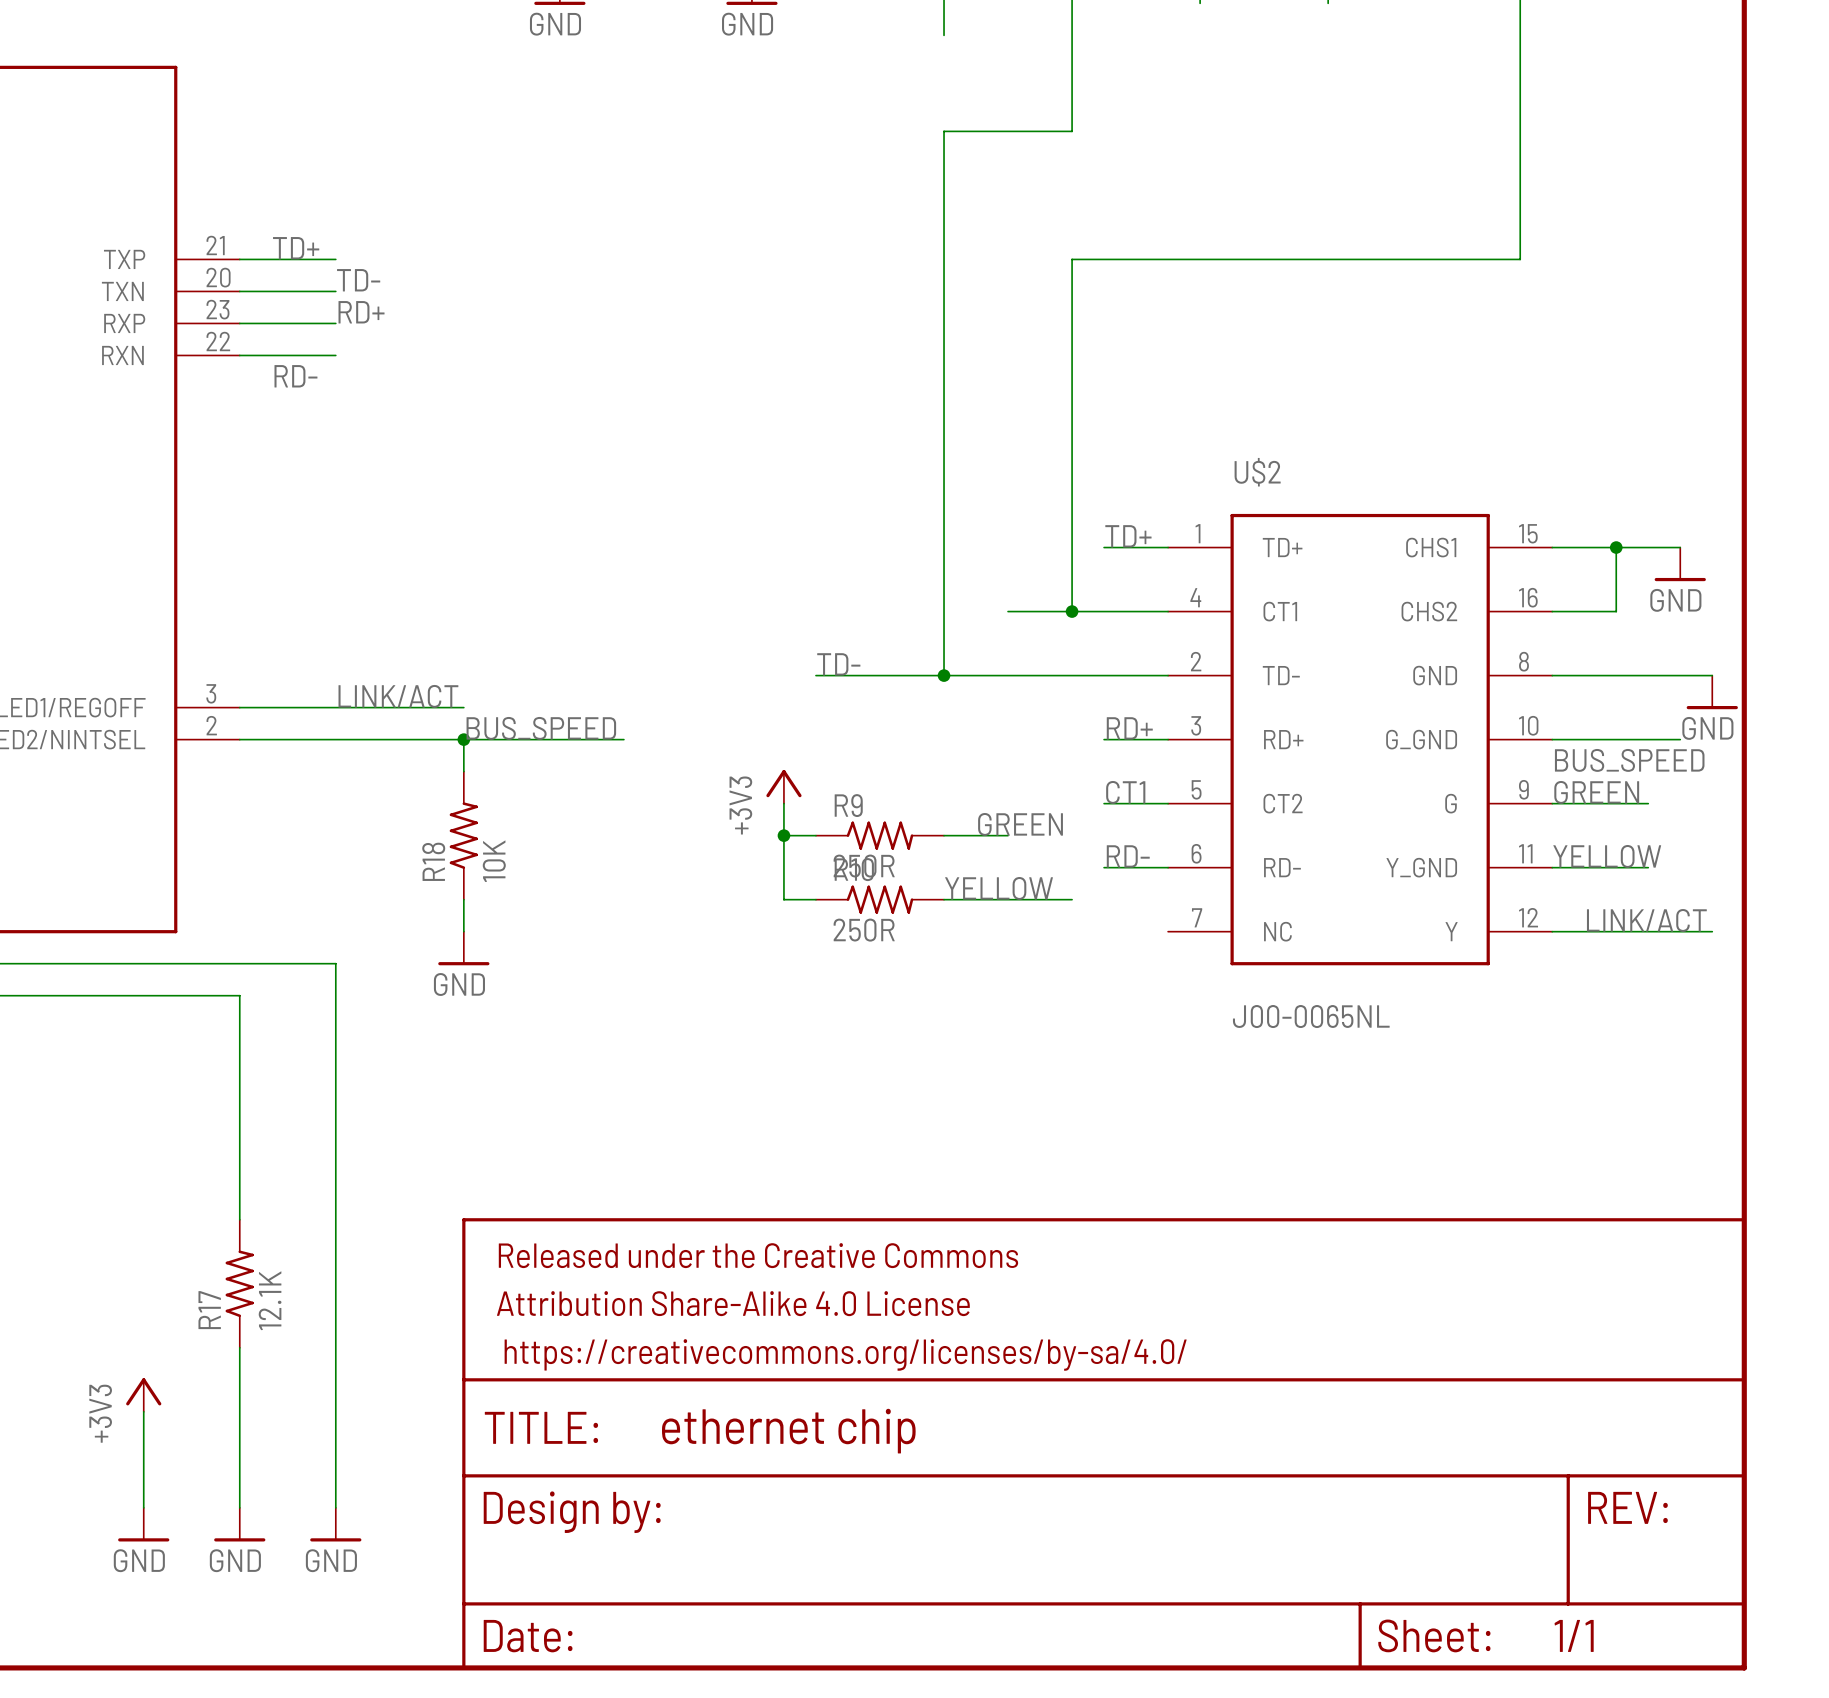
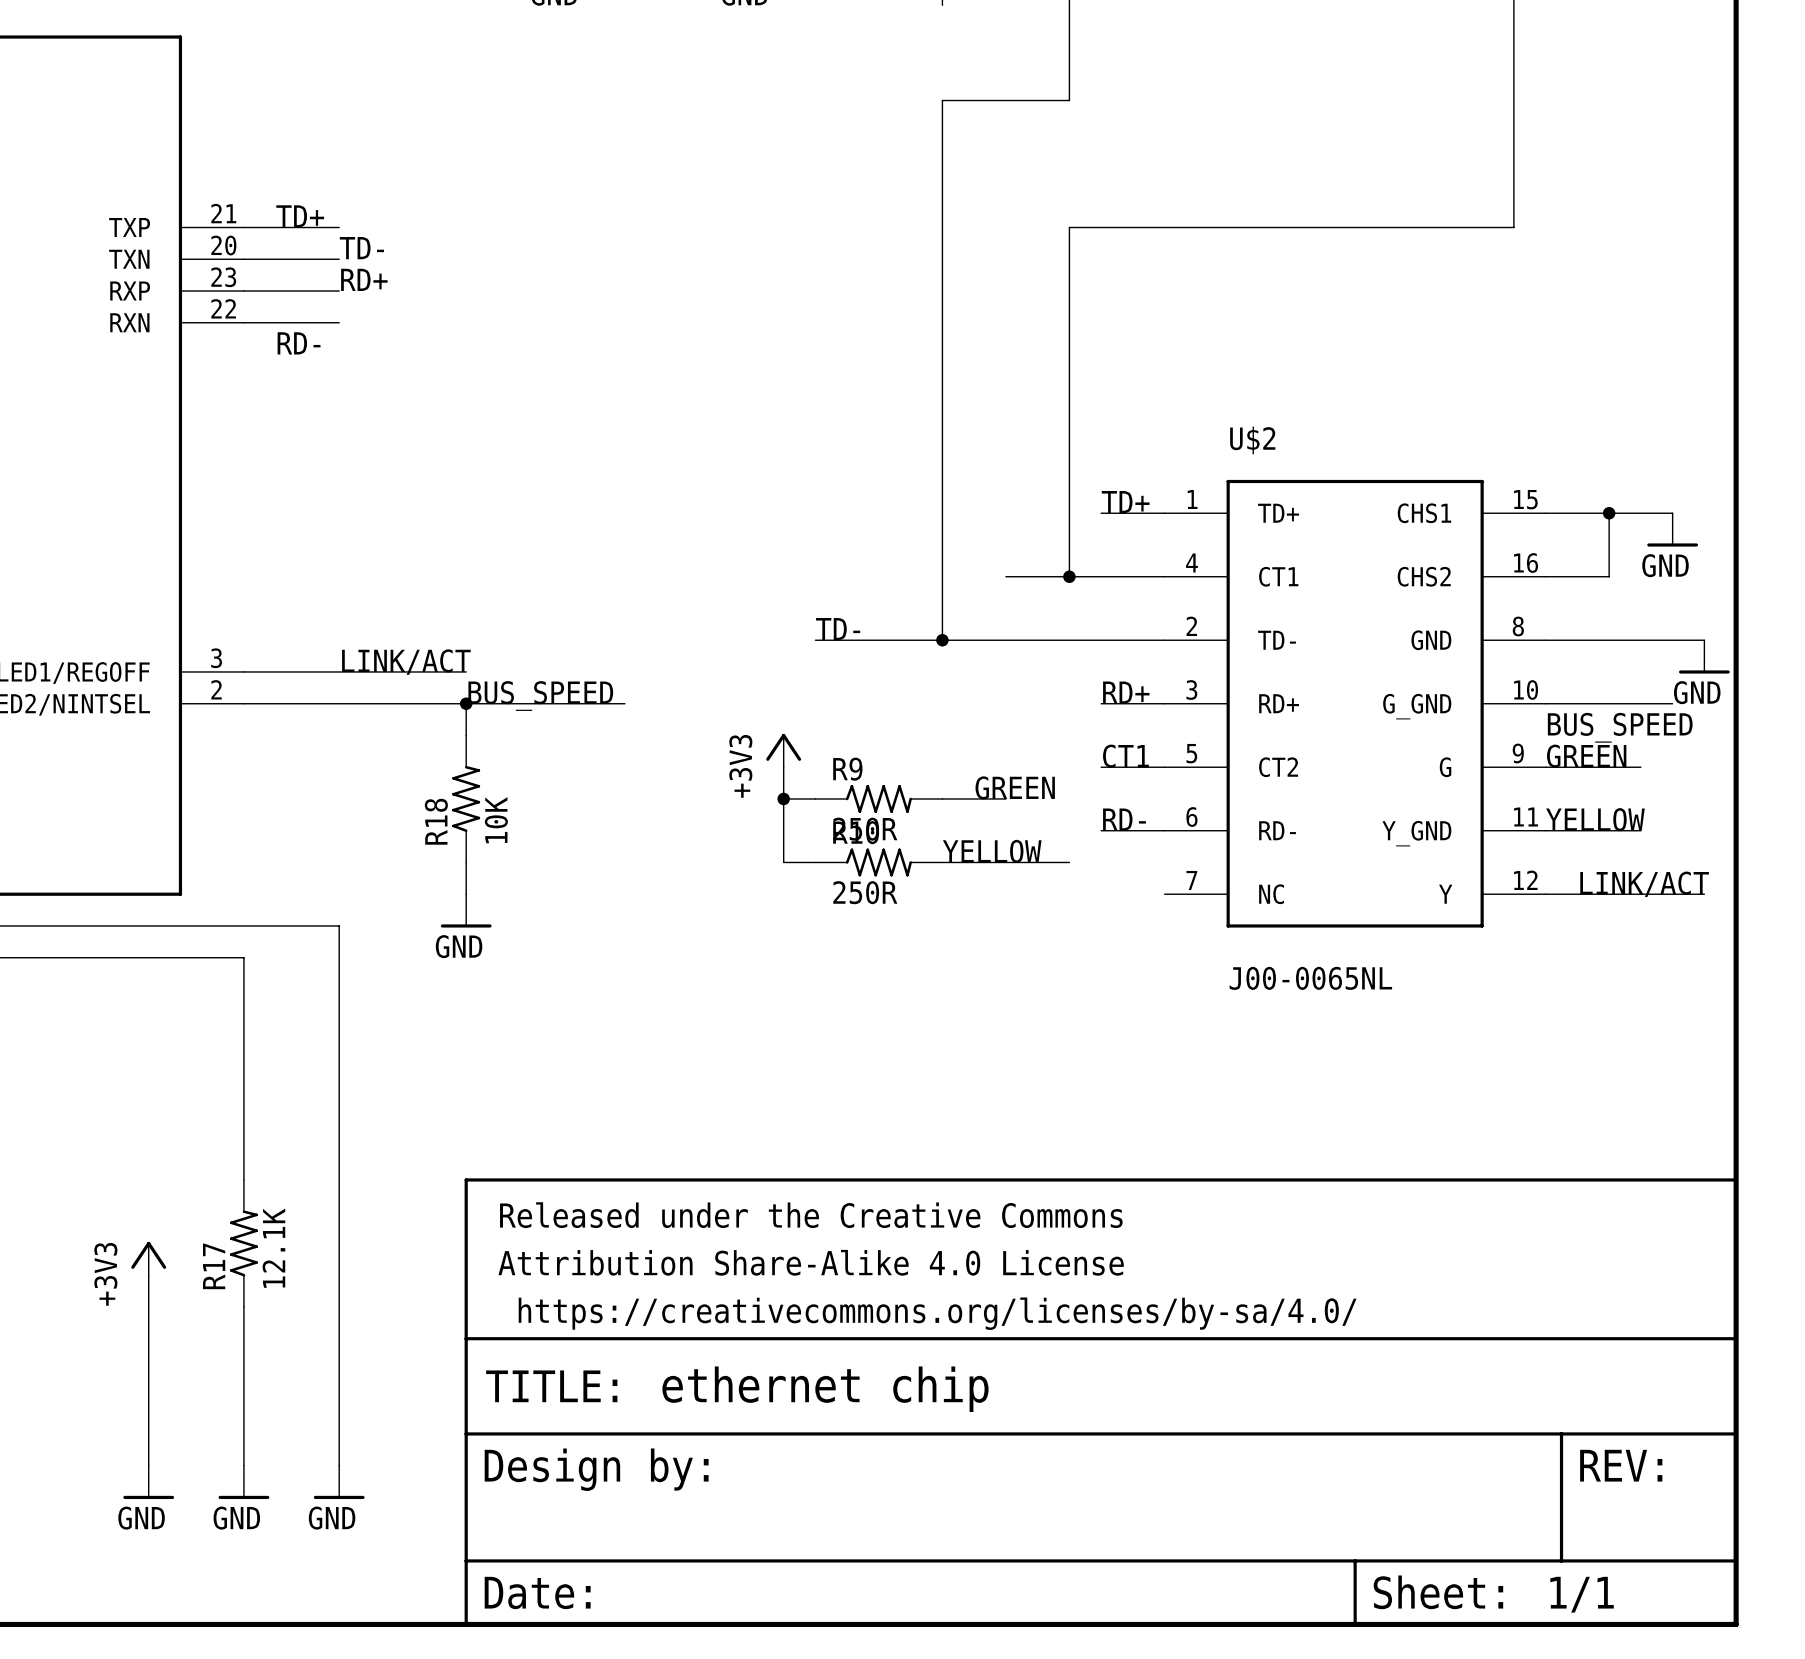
wire: none -> (148, 1275) (148, 1370)
power symbol position: +3V3 (143, 1395) -> +3V3 (148, 1258)

